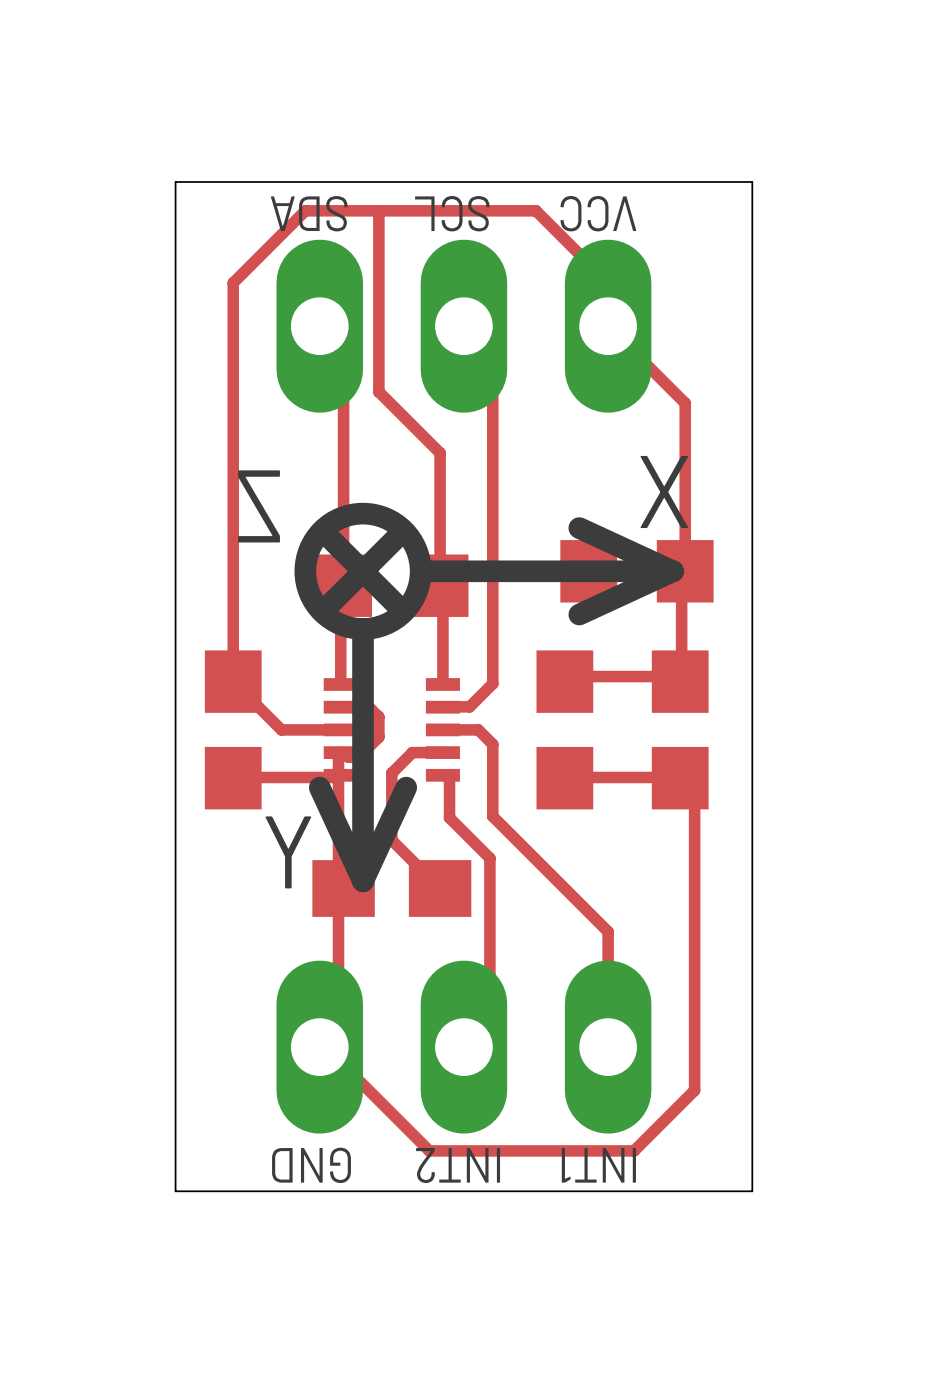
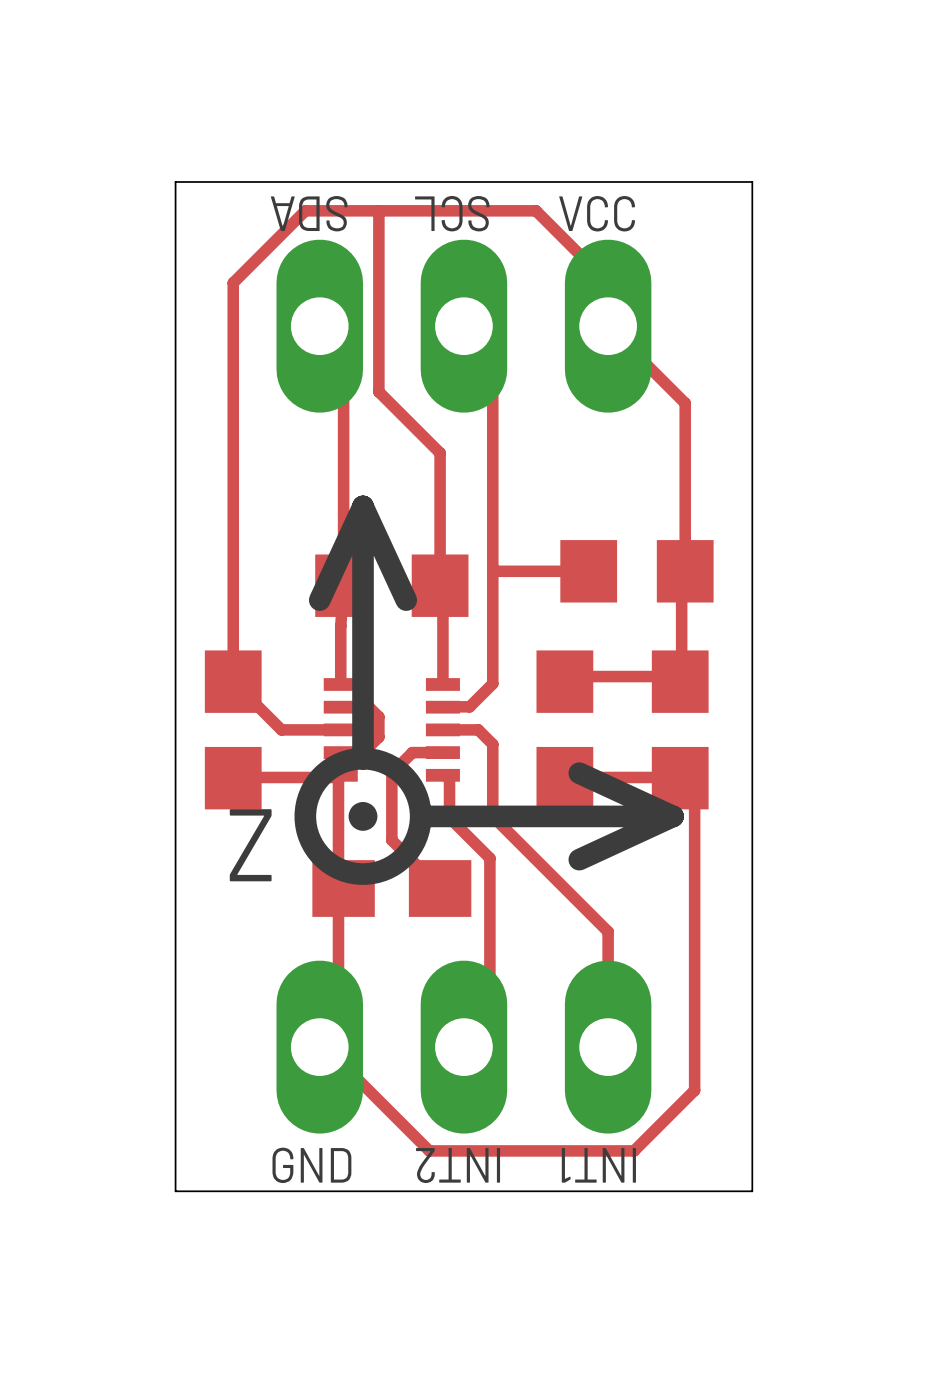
text rotation: 0° (598, 213) -> 180° (597, 213)
drawing: [294, 502, 684, 893] -> none
line: none -> (363, 506) (363, 758)
line: none -> (363, 506) (406, 600)
line: none -> (363, 506) (319, 600)
drawing: none -> [294, 747, 432, 885]
line: none -> (579, 773) (673, 816)
line: none -> (673, 816) (579, 859)
line: none -> (673, 816) (420, 816)
text: none -> Z (250, 845)
text rotation: 0° (311, 1165) -> 180° (311, 1165)

